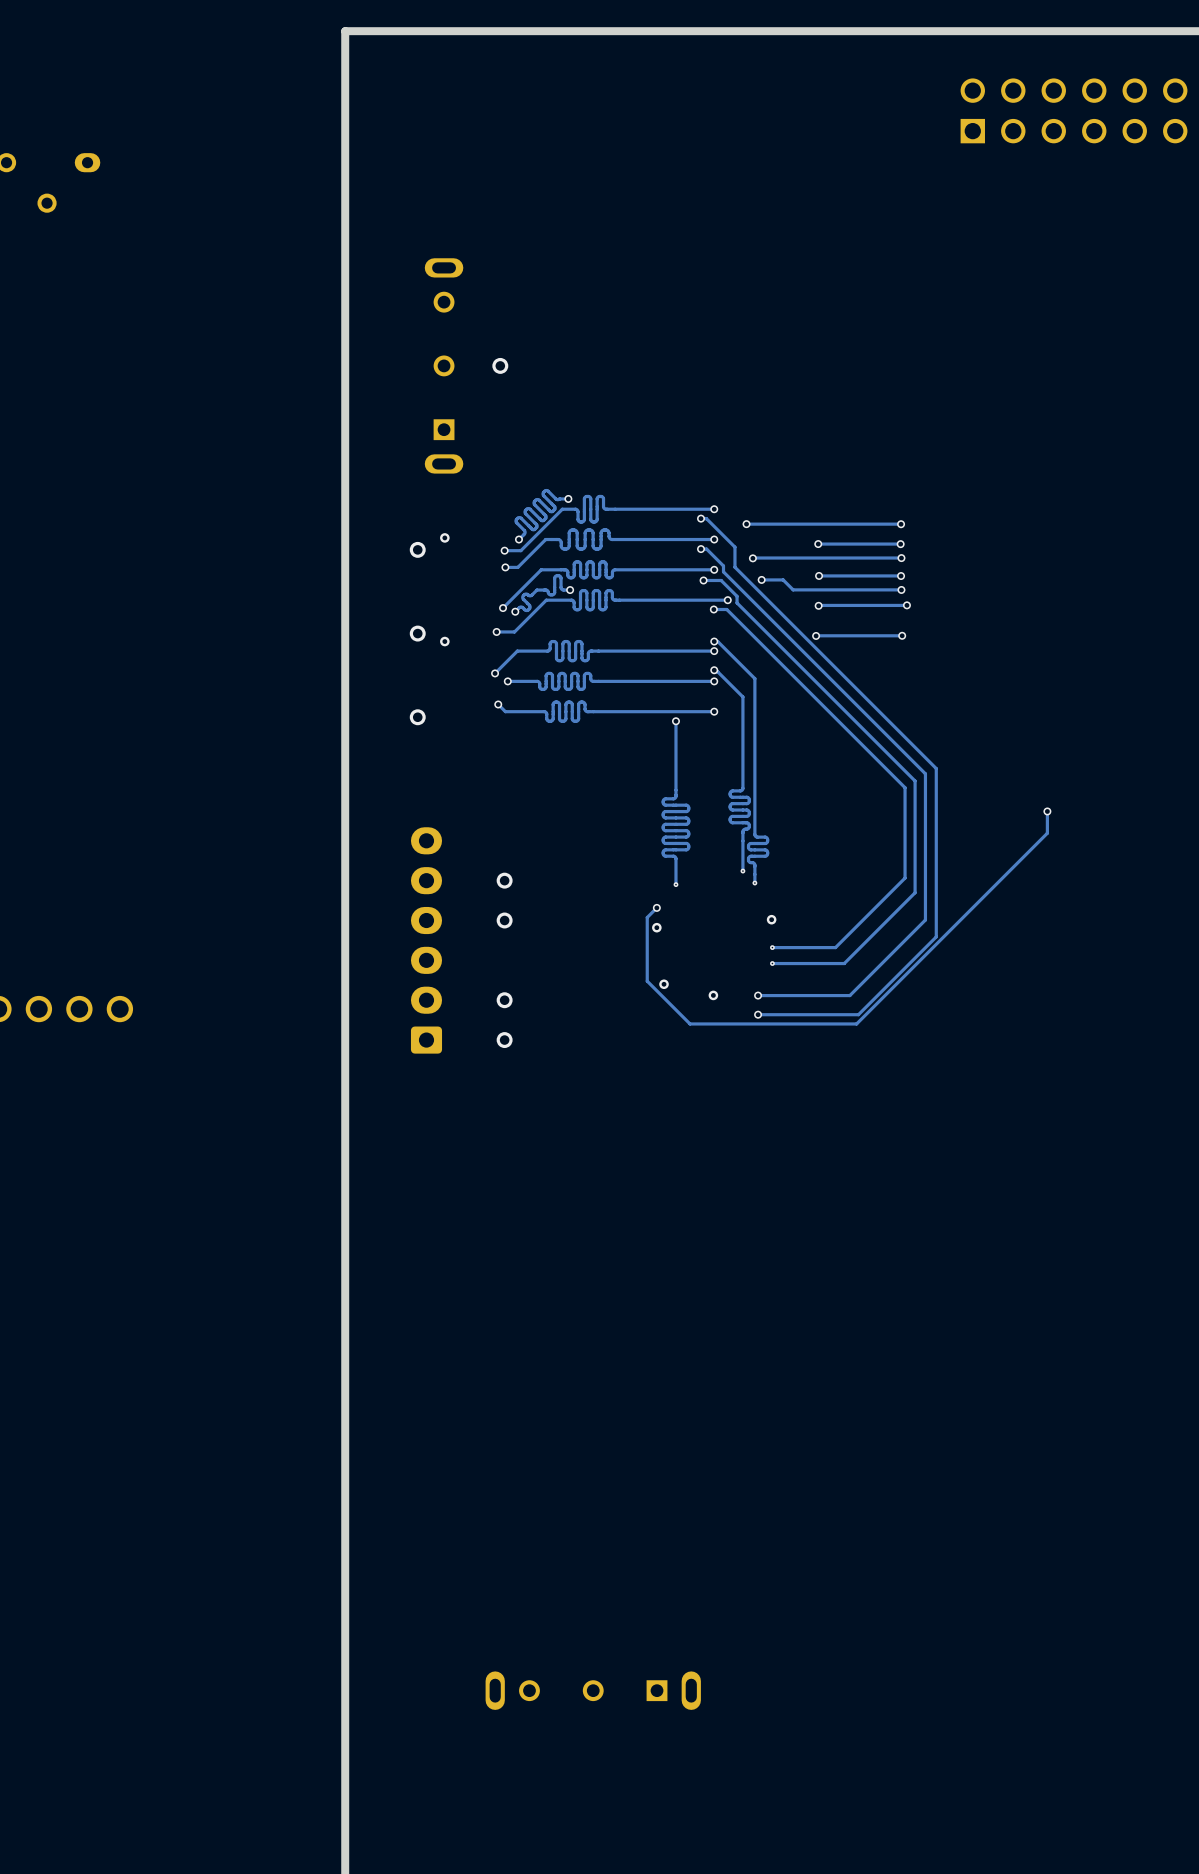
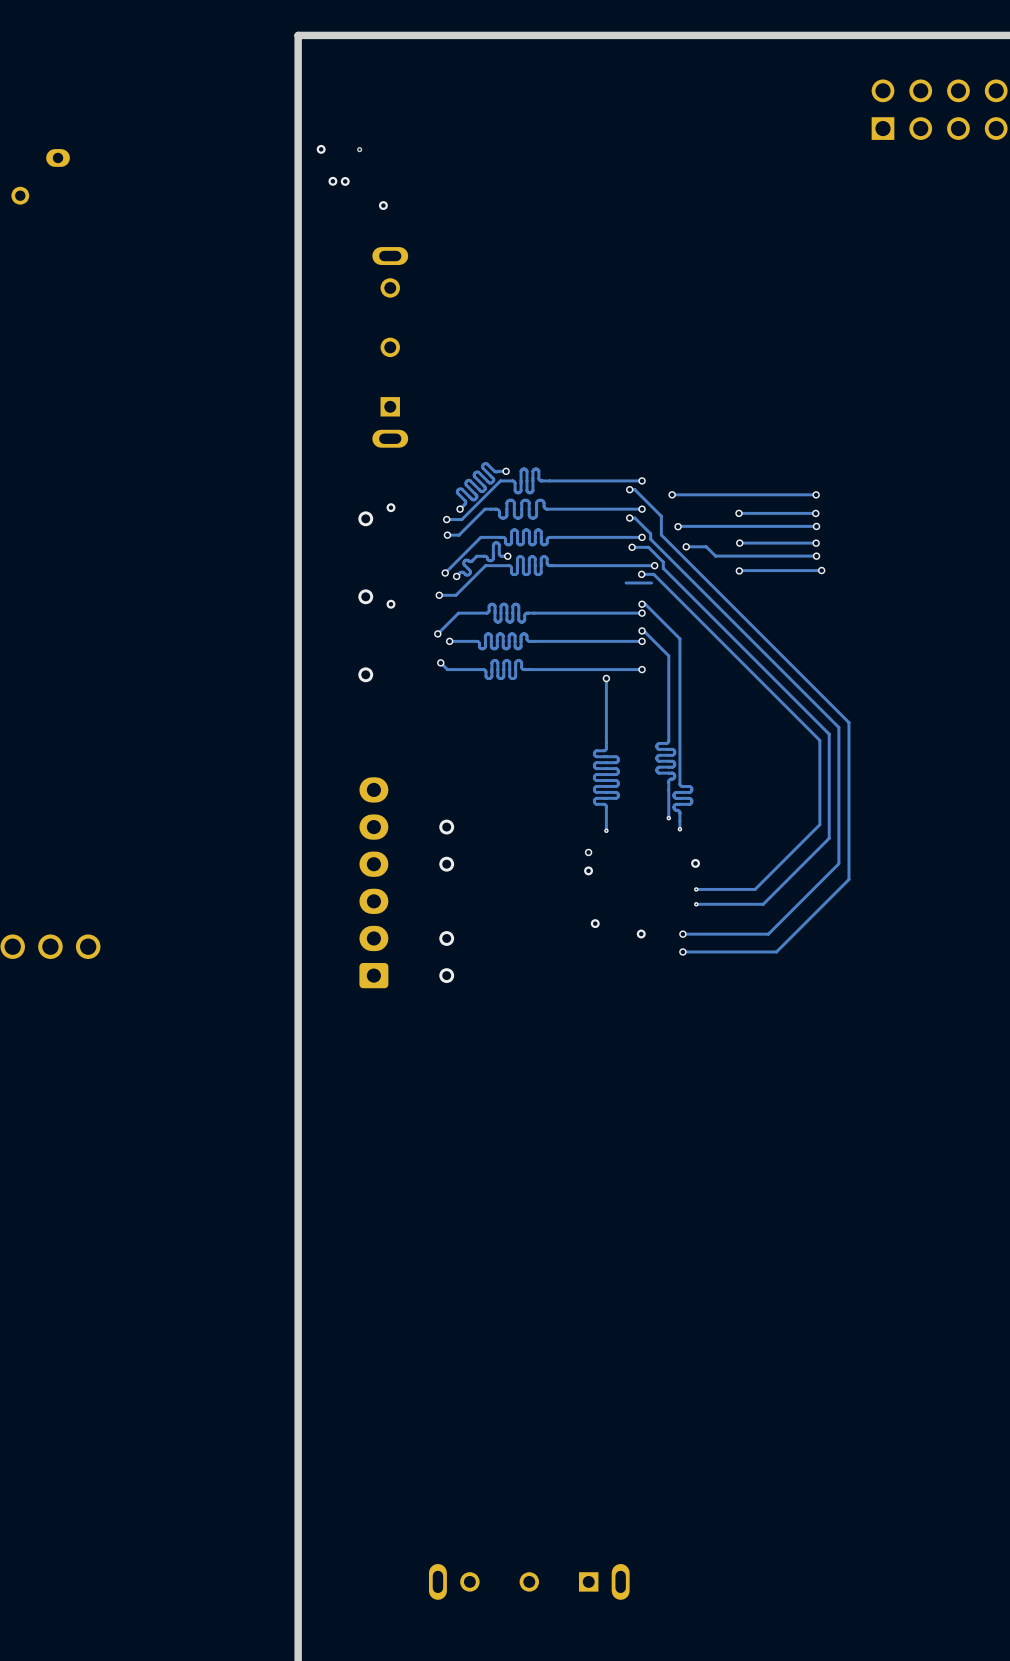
via: none -> (321, 149)
part: none -> (359, 149)
via: none -> (332, 181)
via: none -> (345, 181)
via: none -> (383, 205)
via: (500, 365) -> none
track: none -> (651, 582) (626, 582)
via: (816, 635) -> none
track: (902, 635) (816, 635) -> none
via: (902, 635) -> none
track: (1047, 811) (1047, 833) (856, 1023) (690, 1023) (647, 981) (647, 917) (656, 907) -> none
via: (1047, 811) -> none

